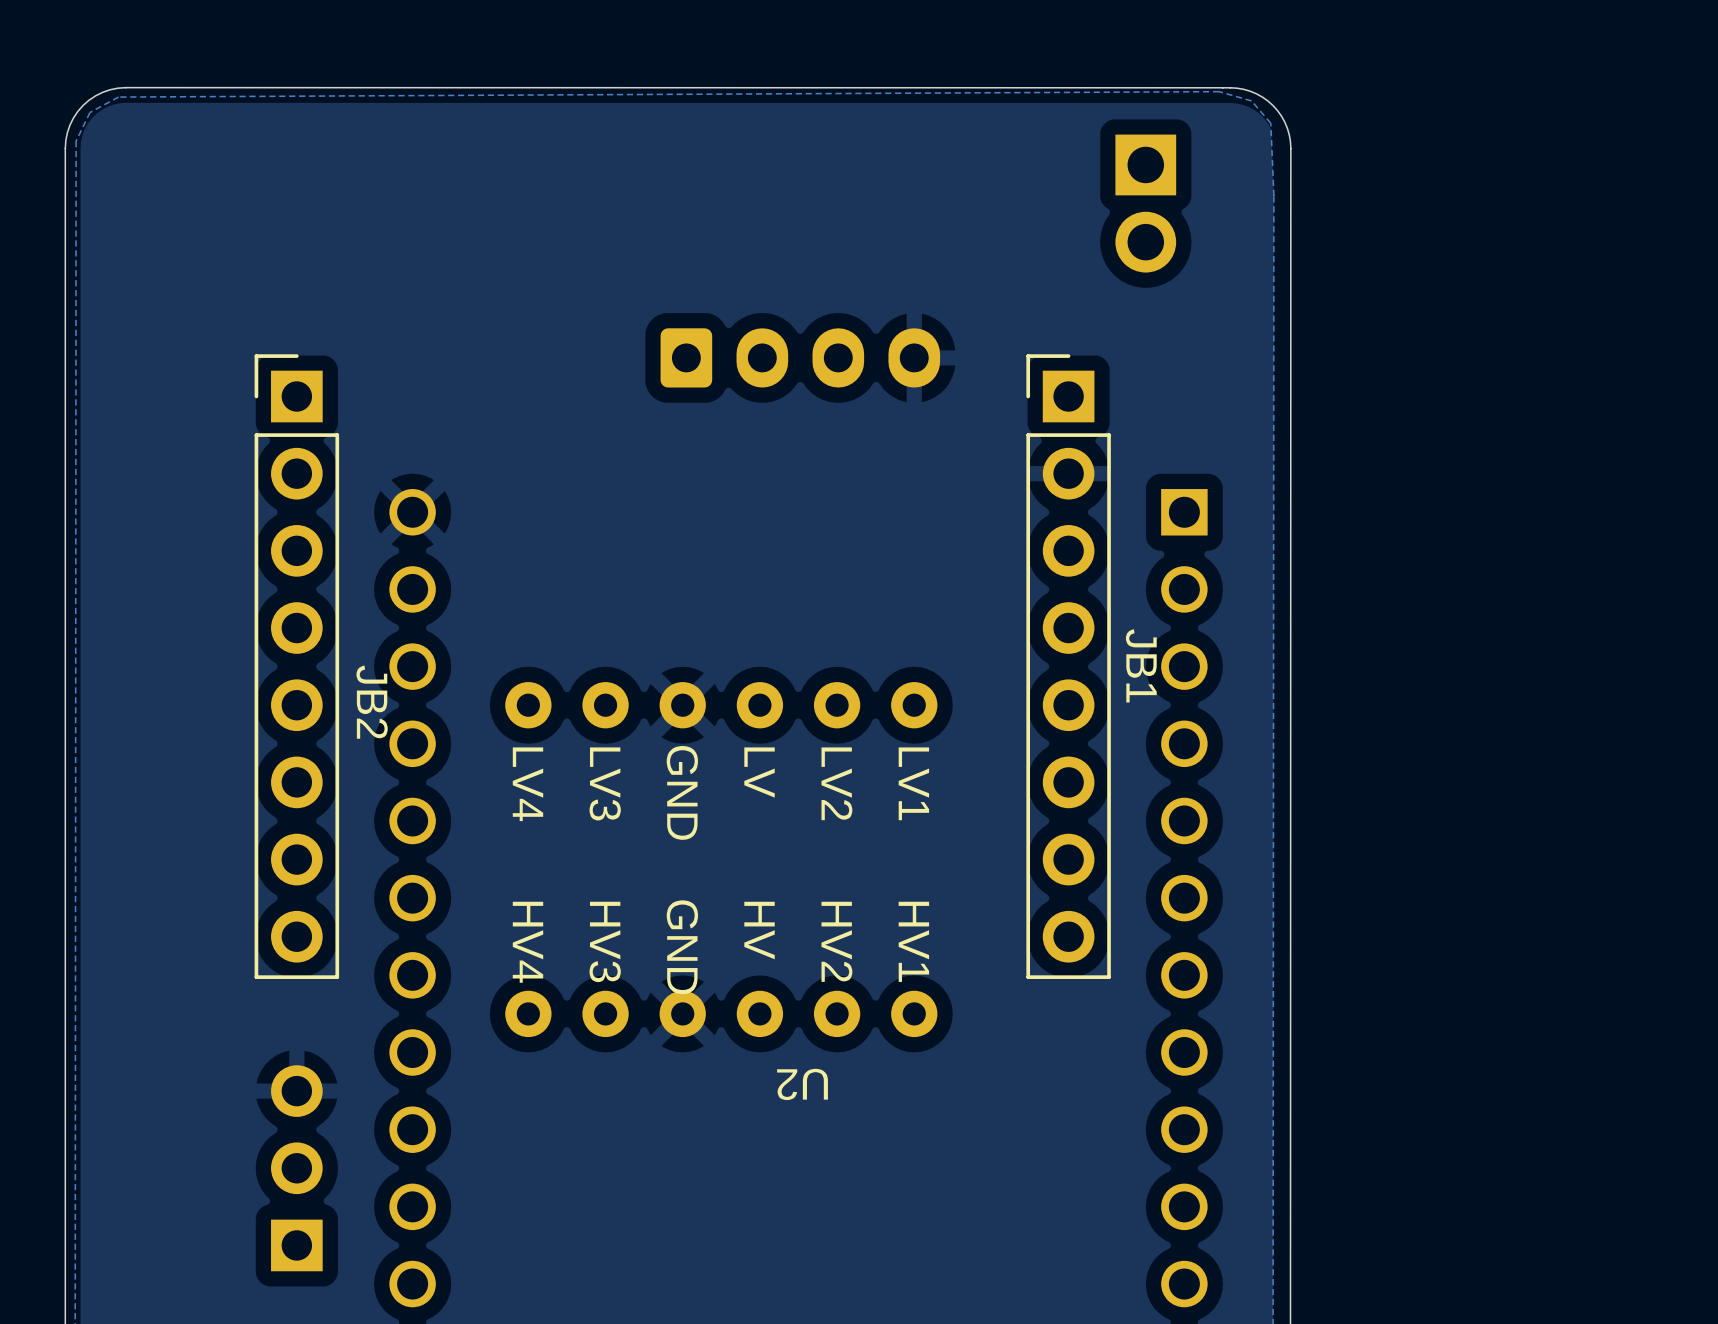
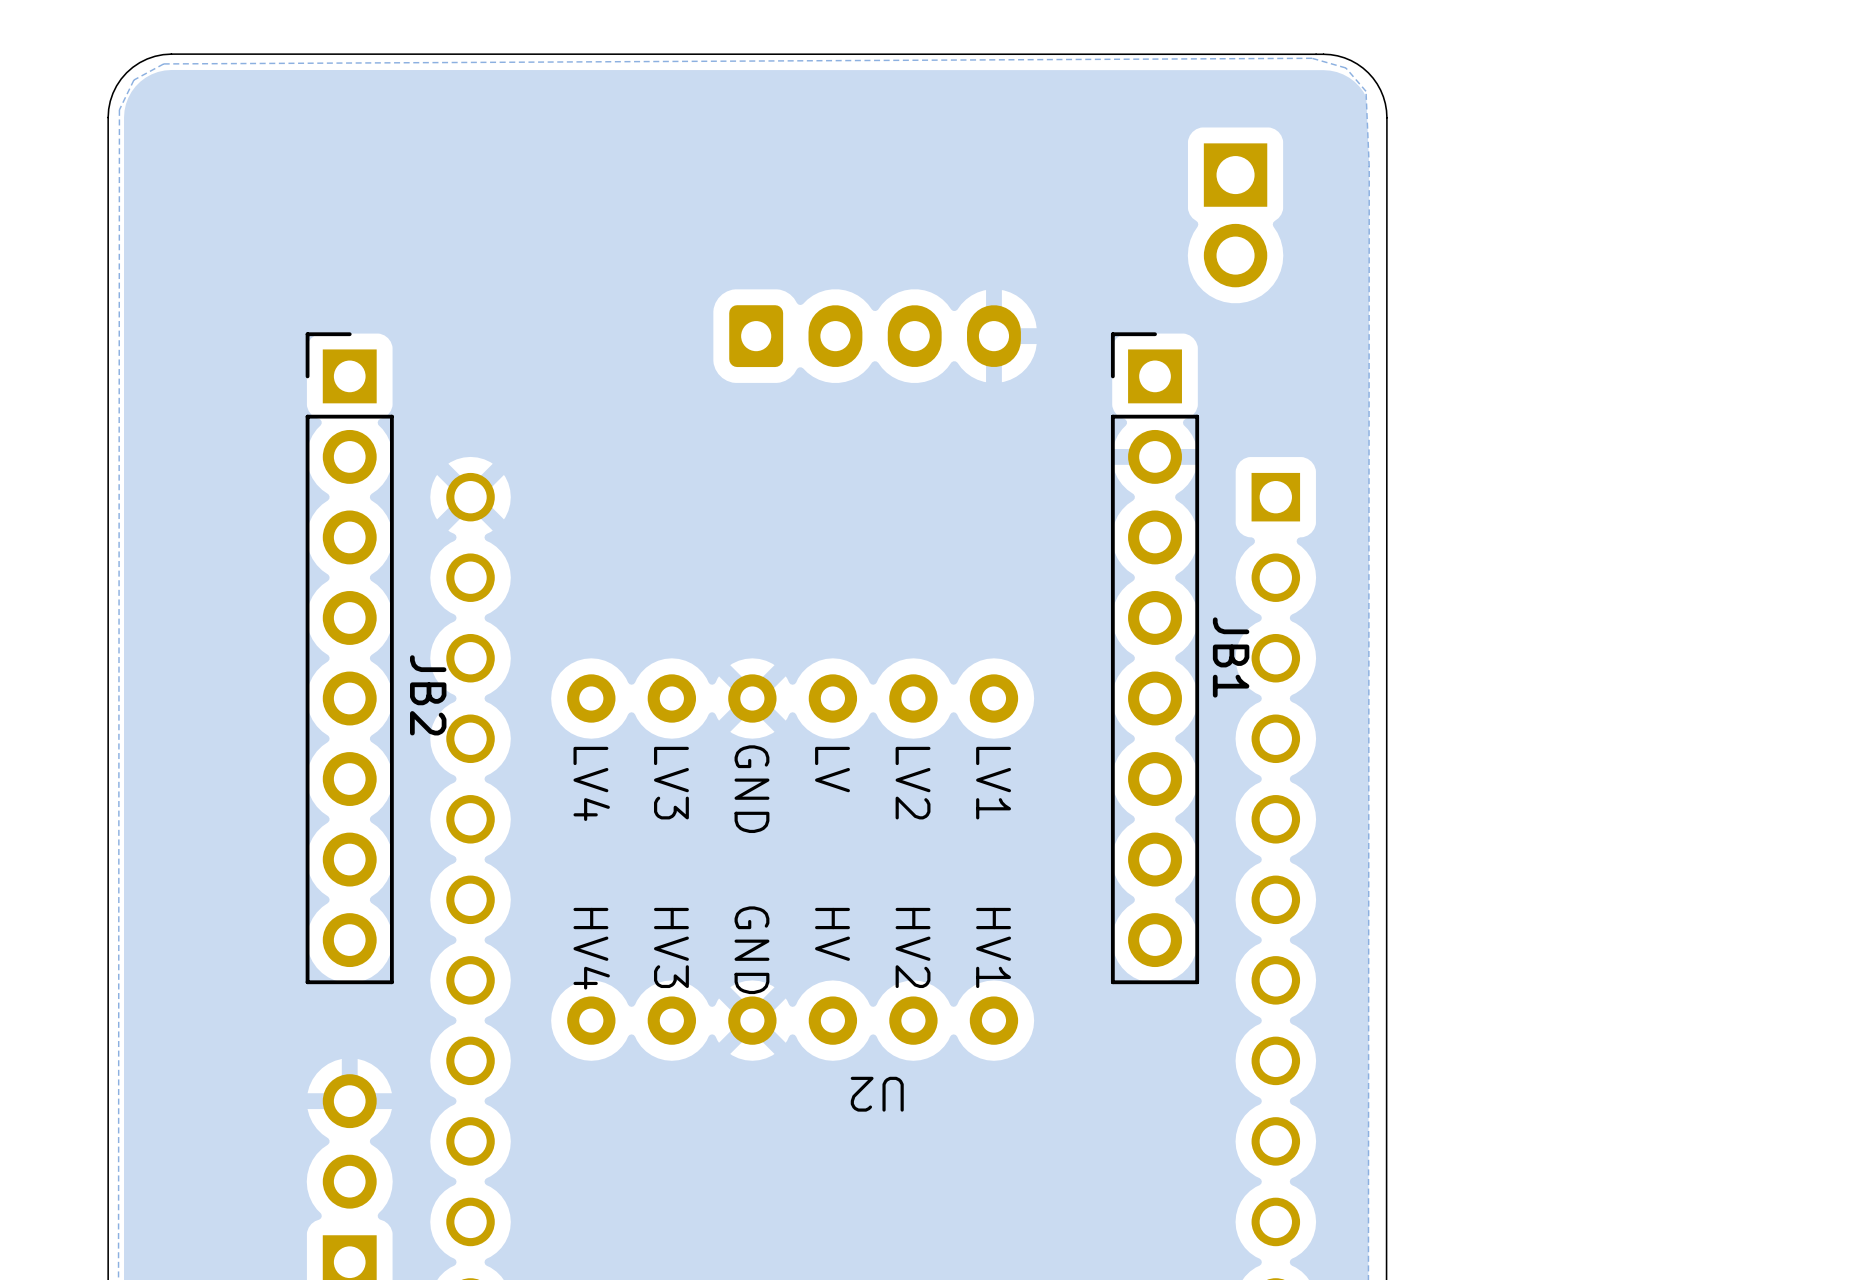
part position: (1145, 203) -> (1235, 215)

